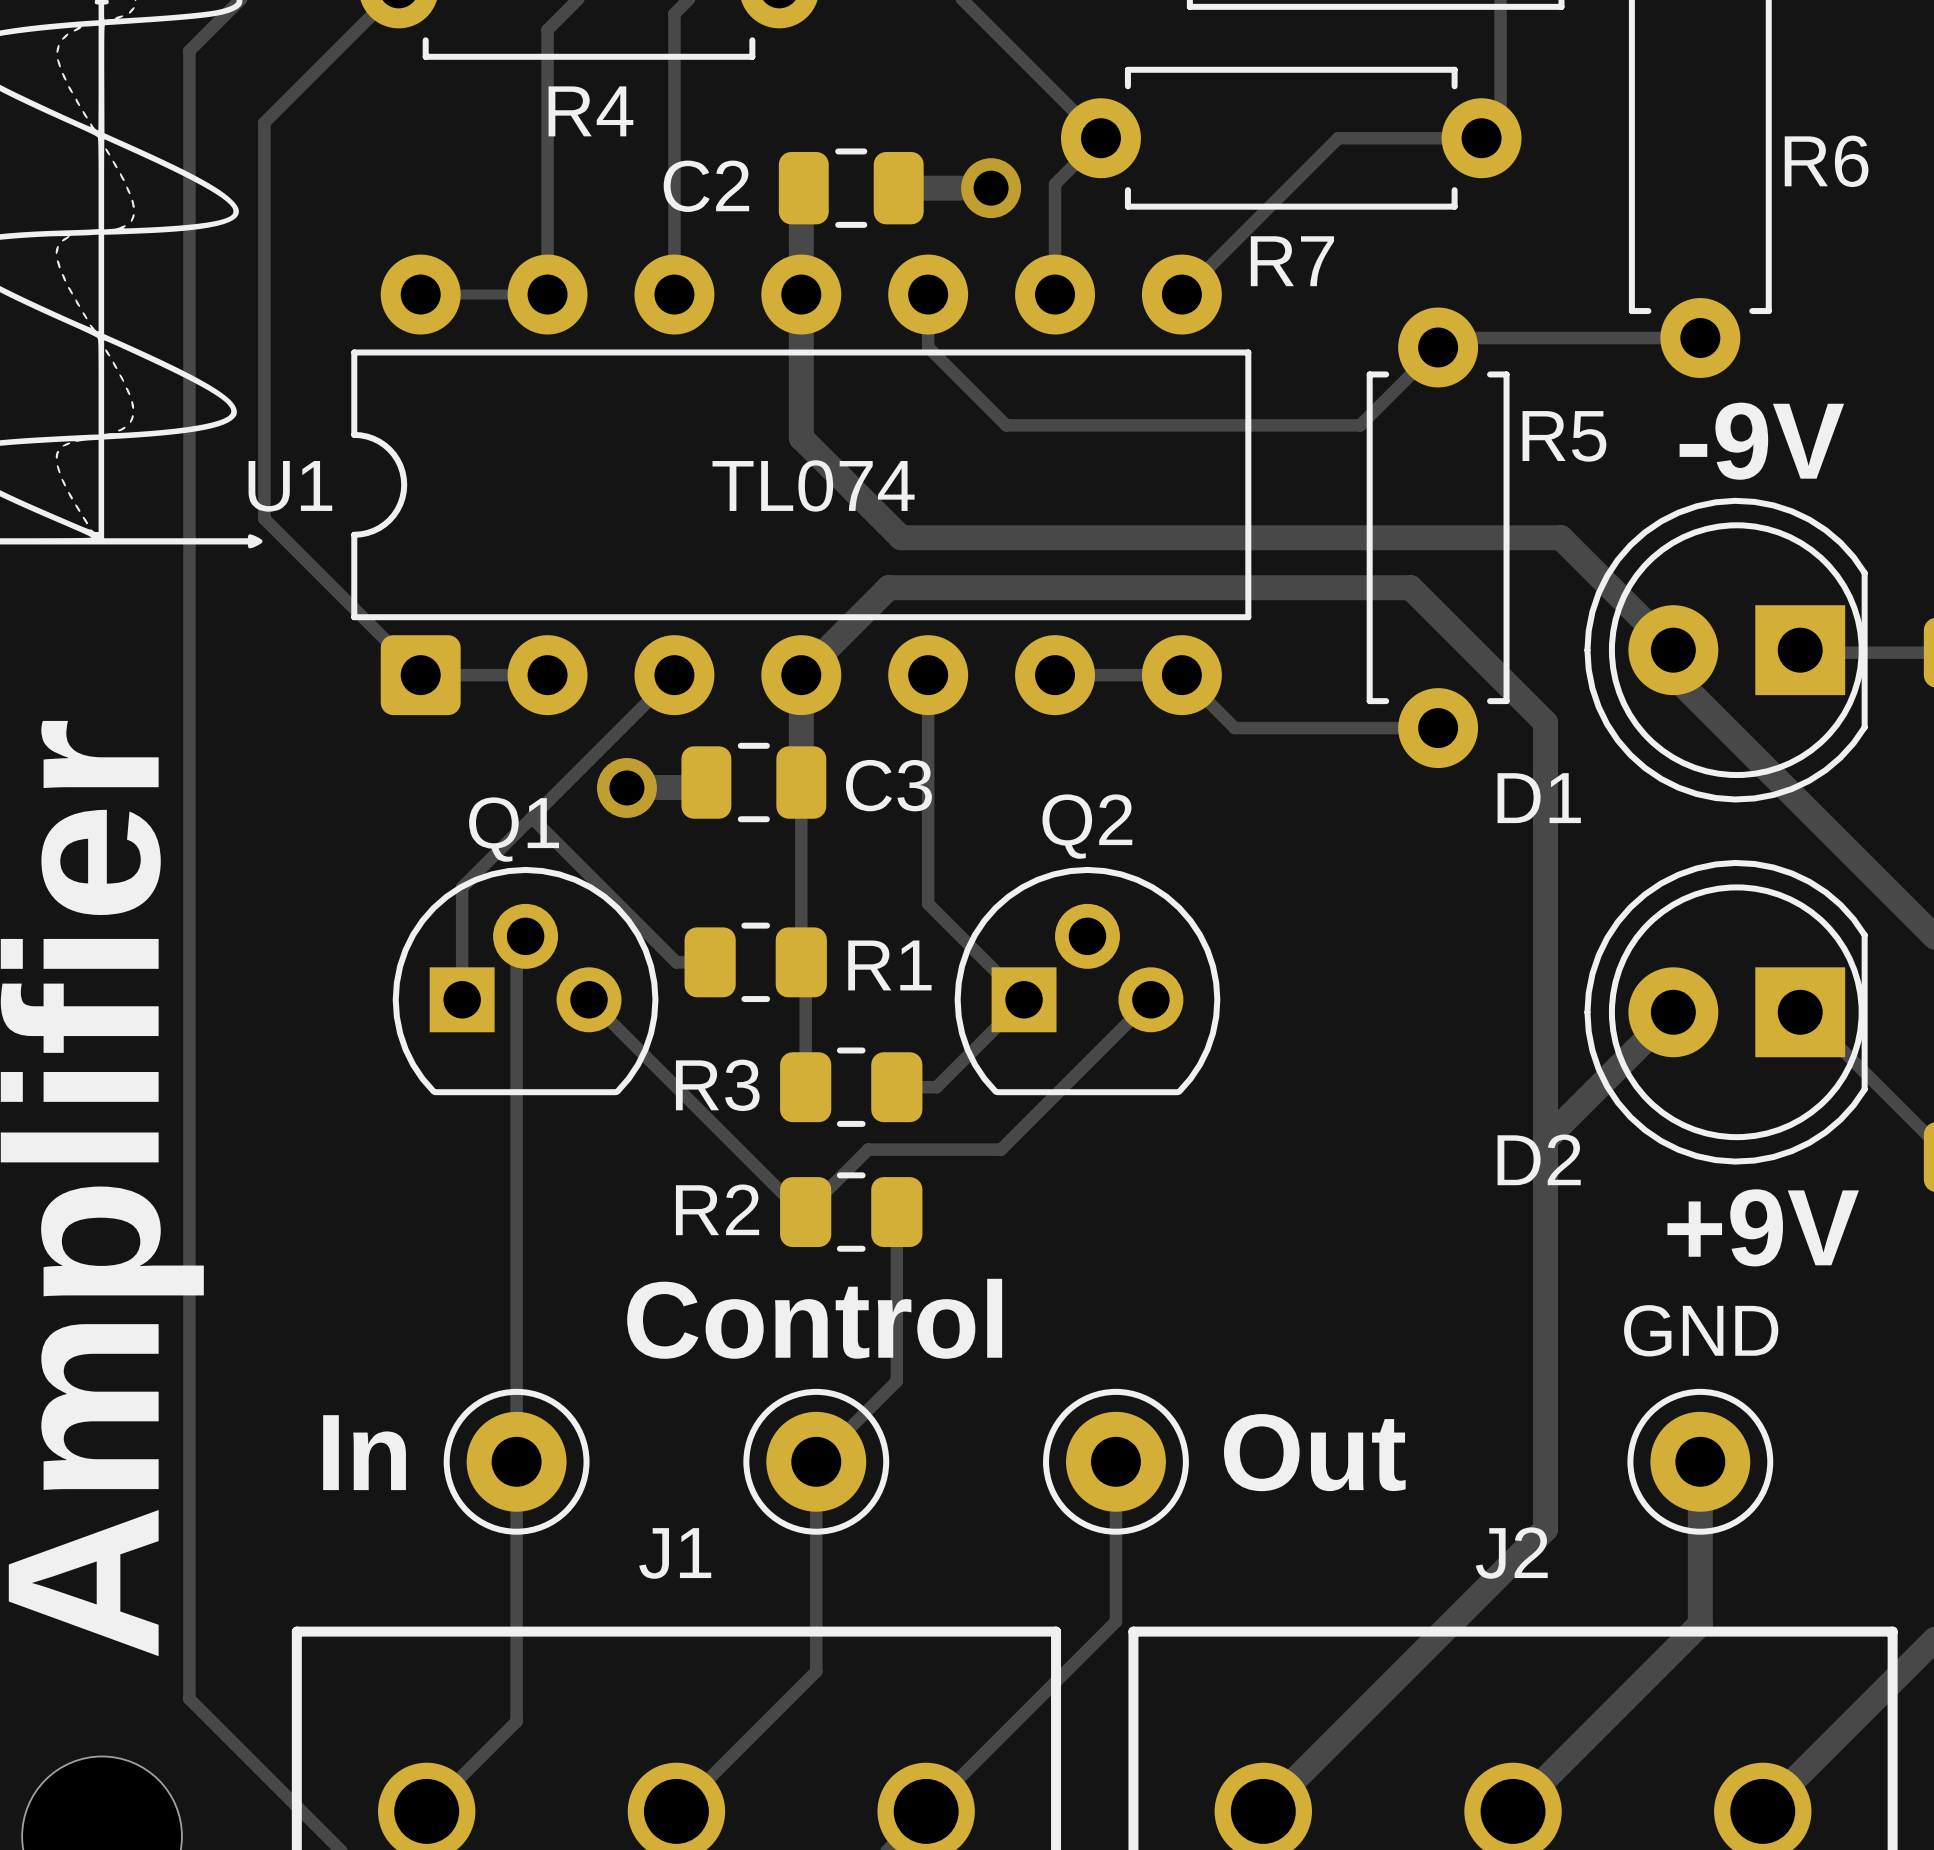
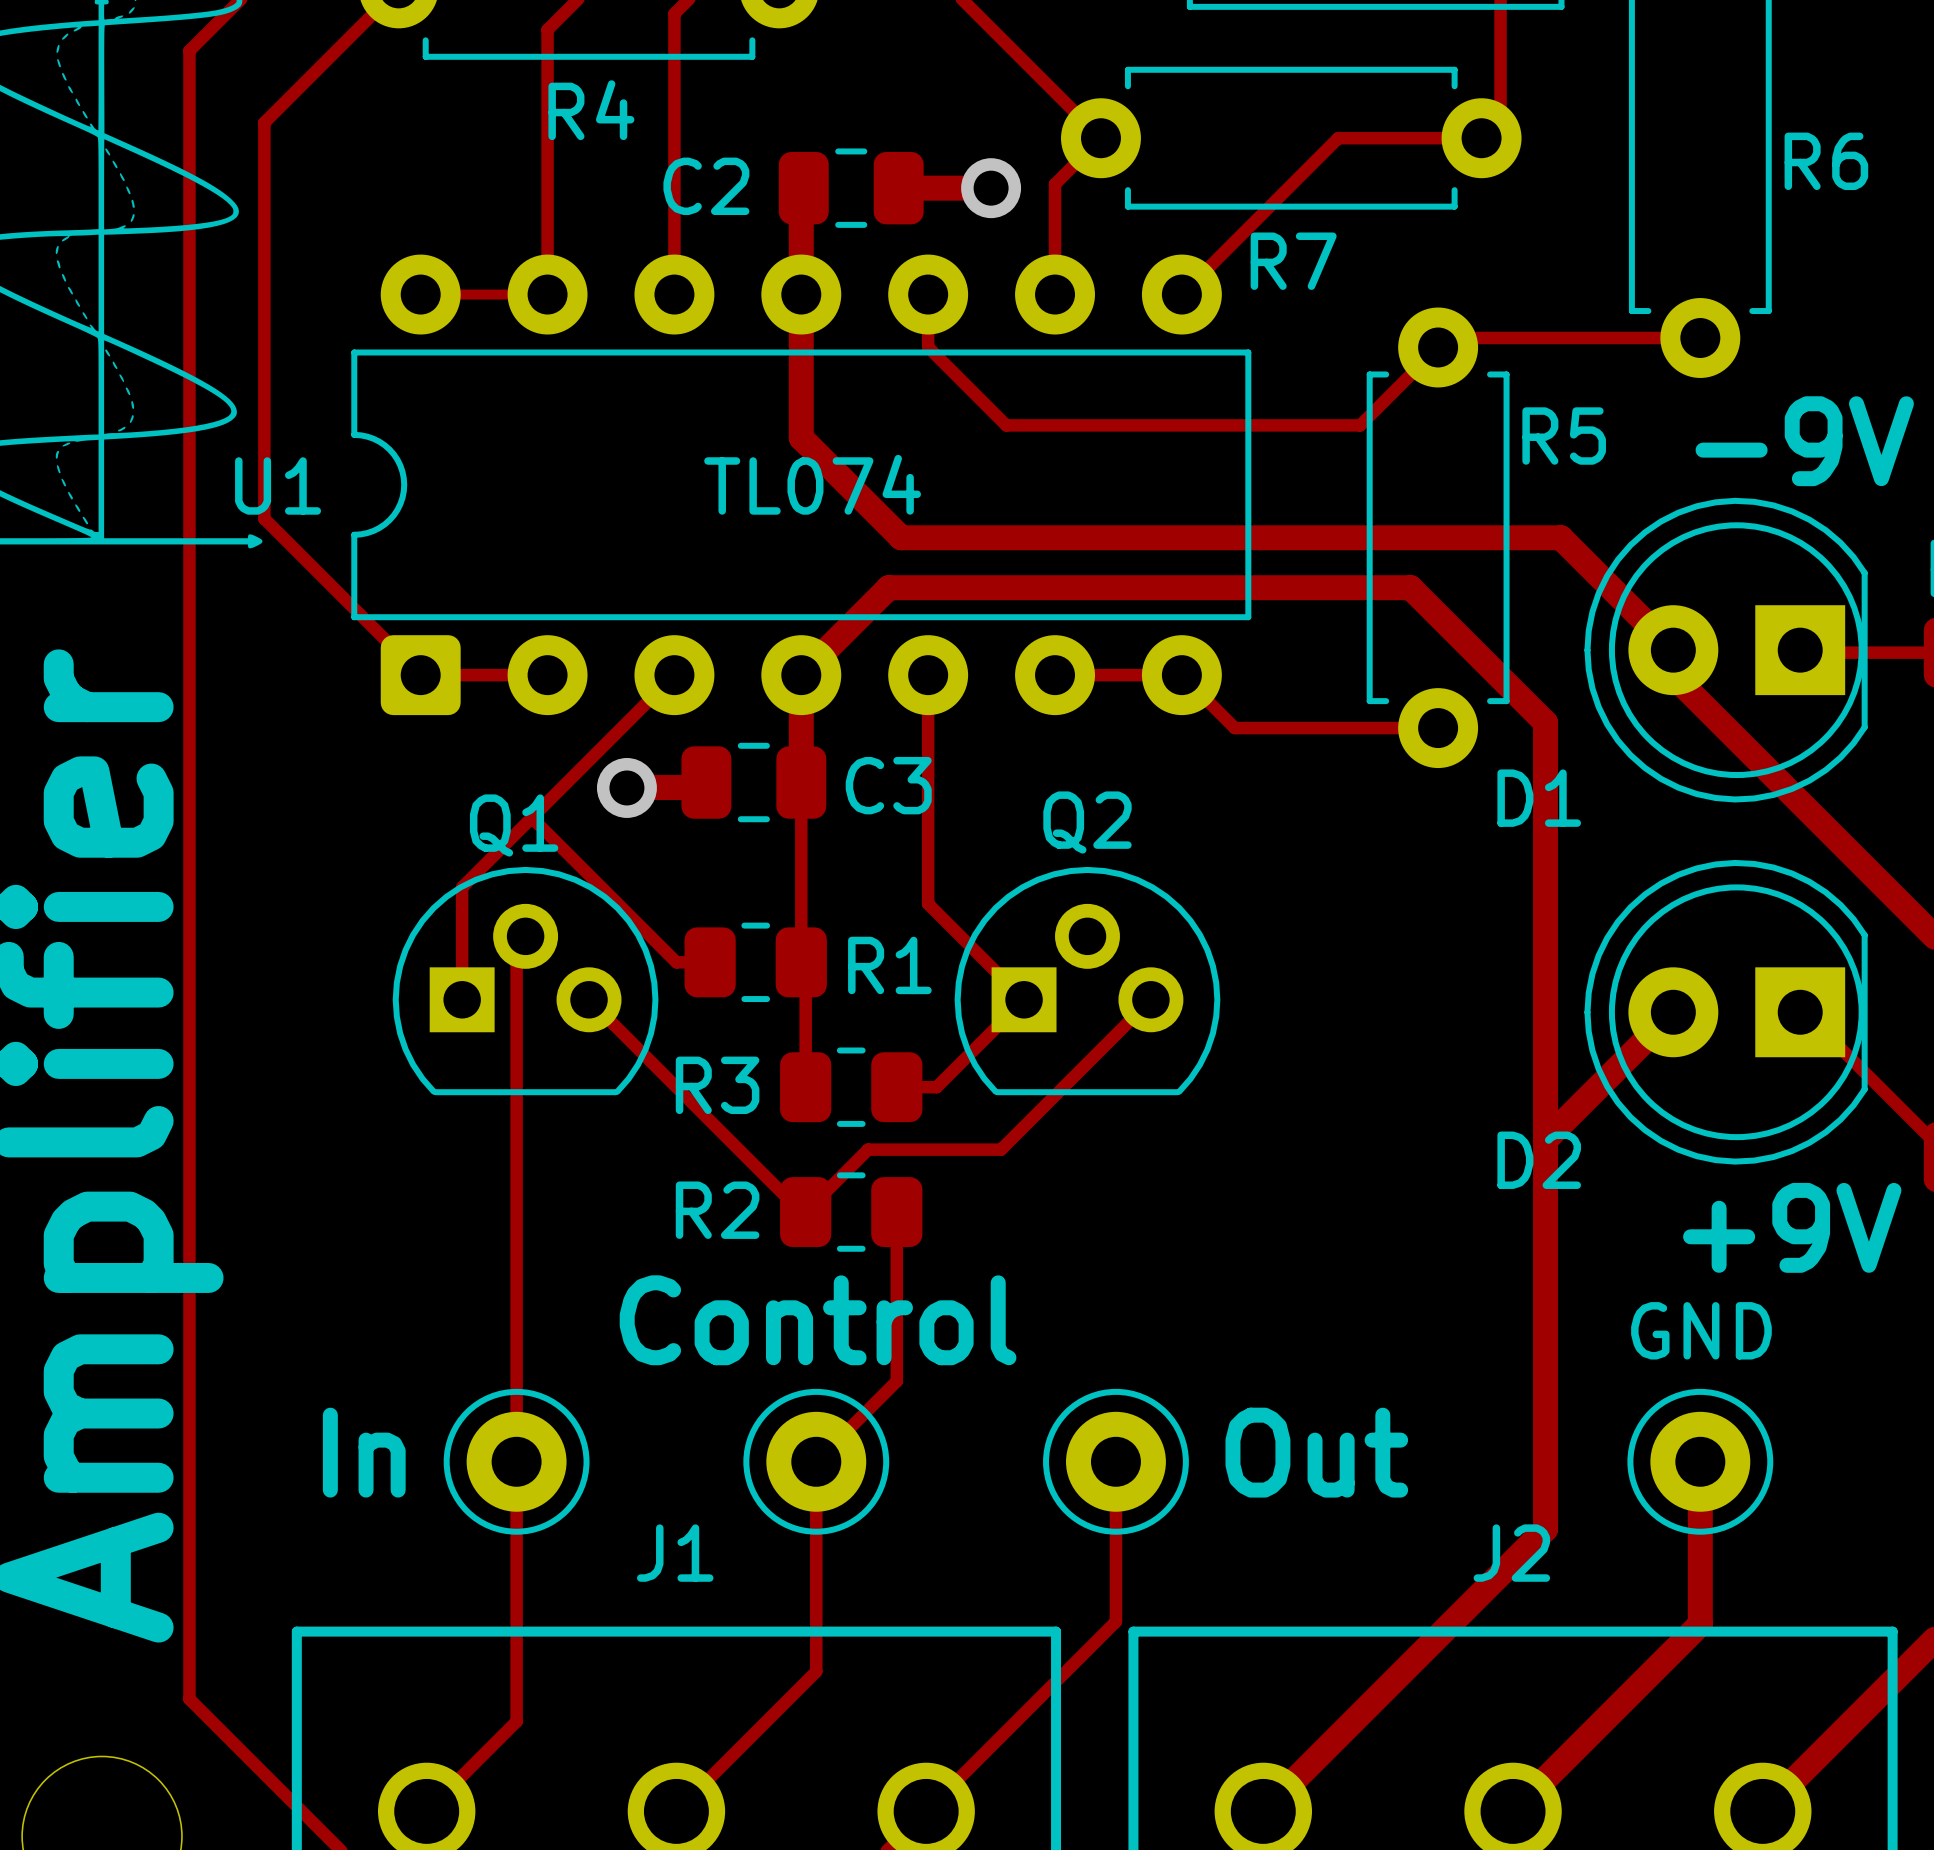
U1 name position: U1 (290, 486) -> U1 (278, 485)

